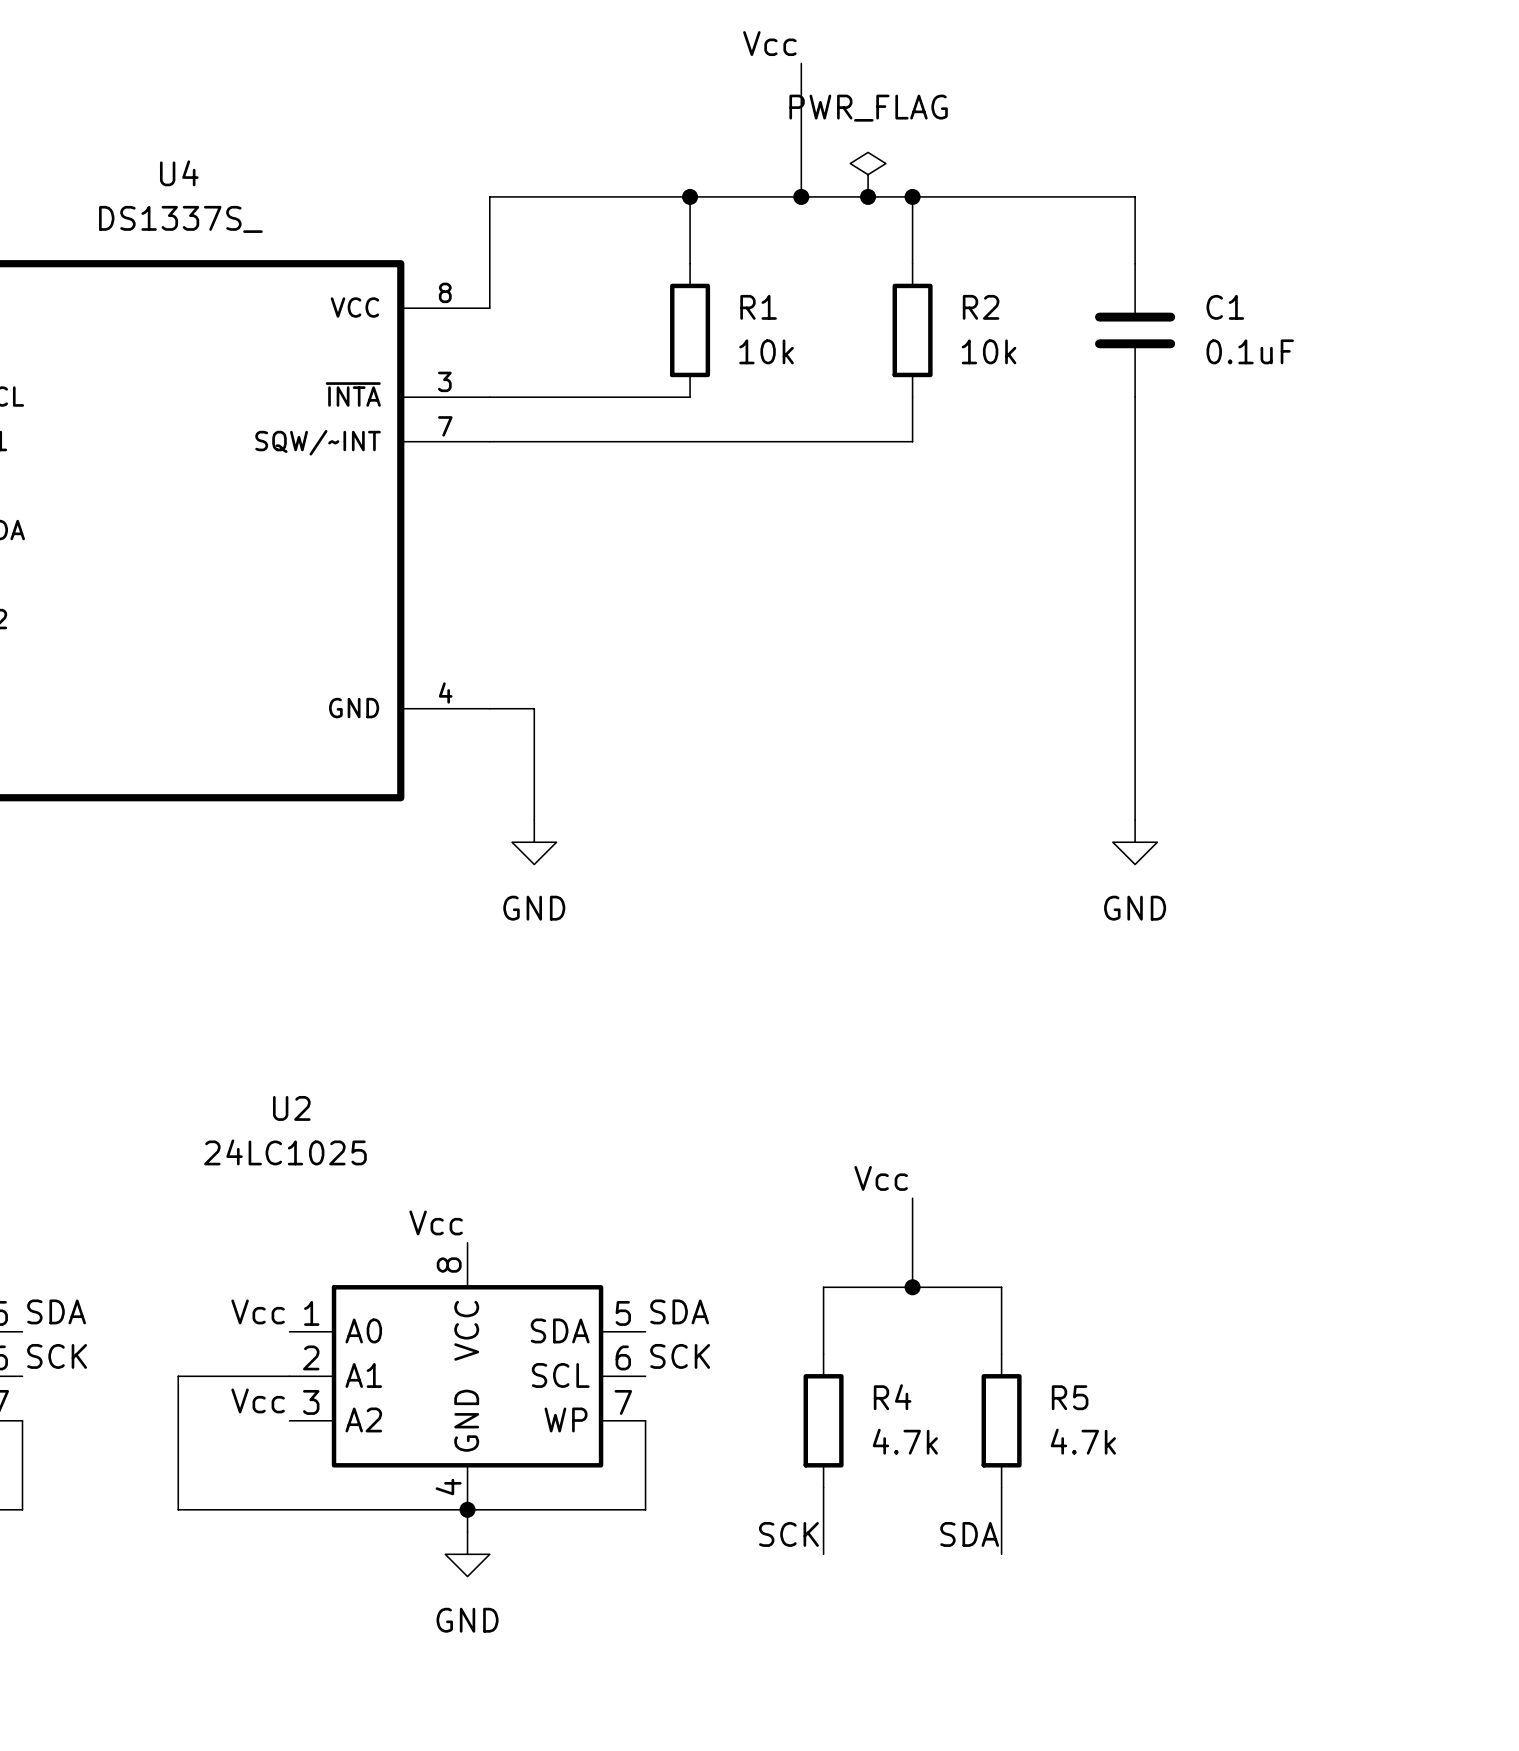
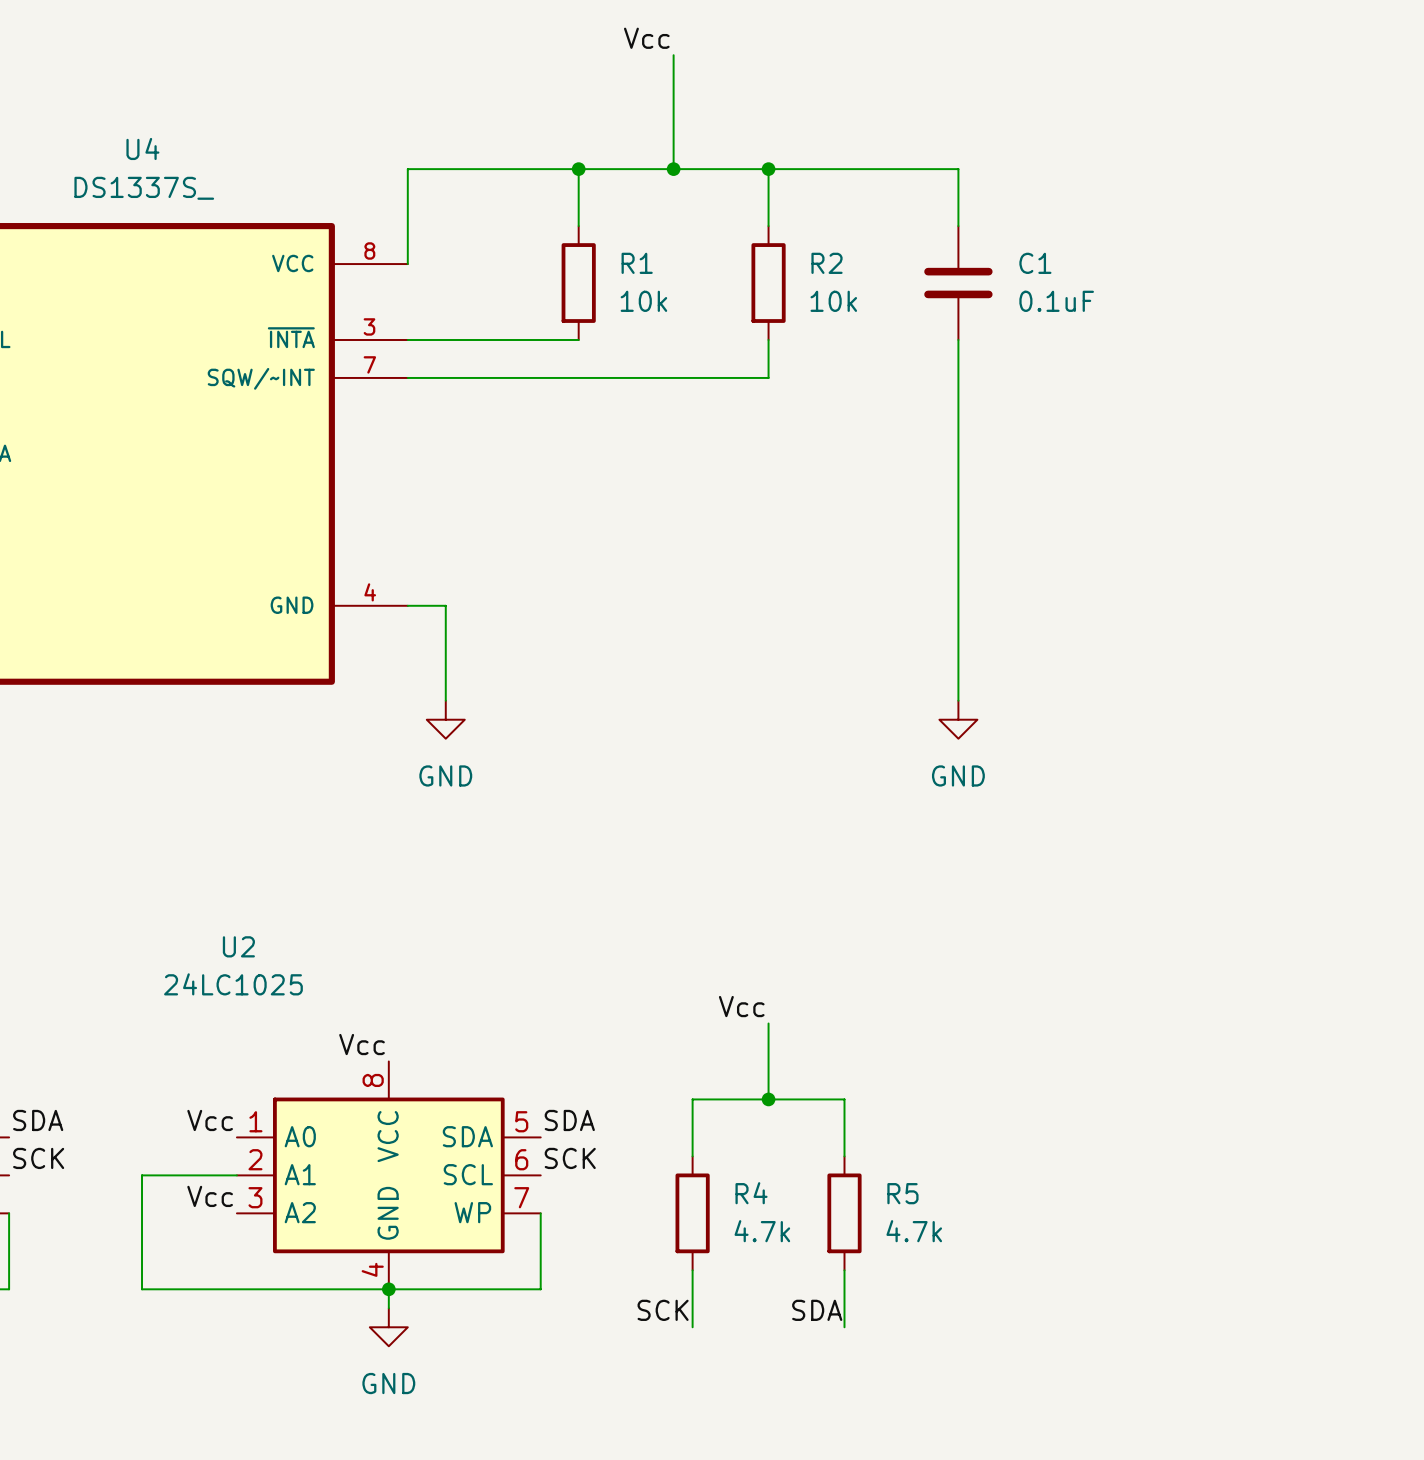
power symbol: PWR_FLAG (868, 174) -> none
junction: (868, 196) -> none

